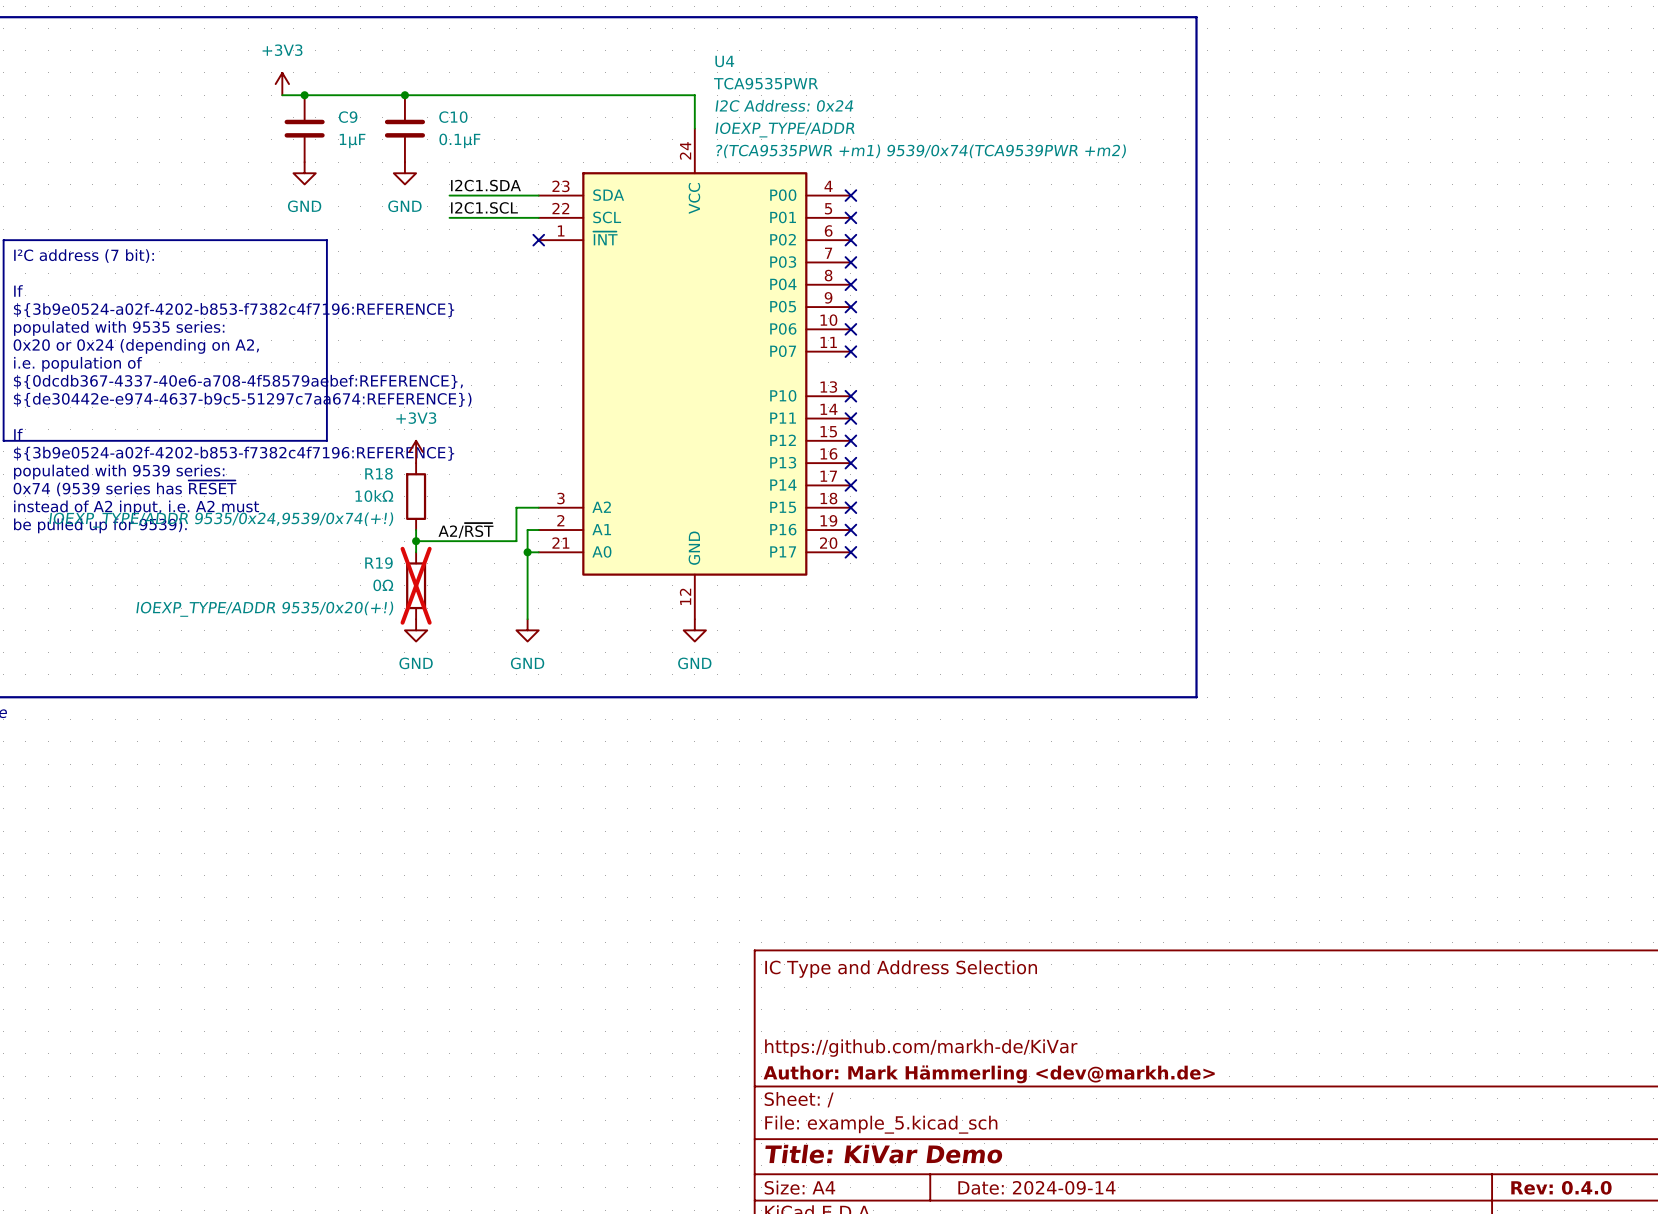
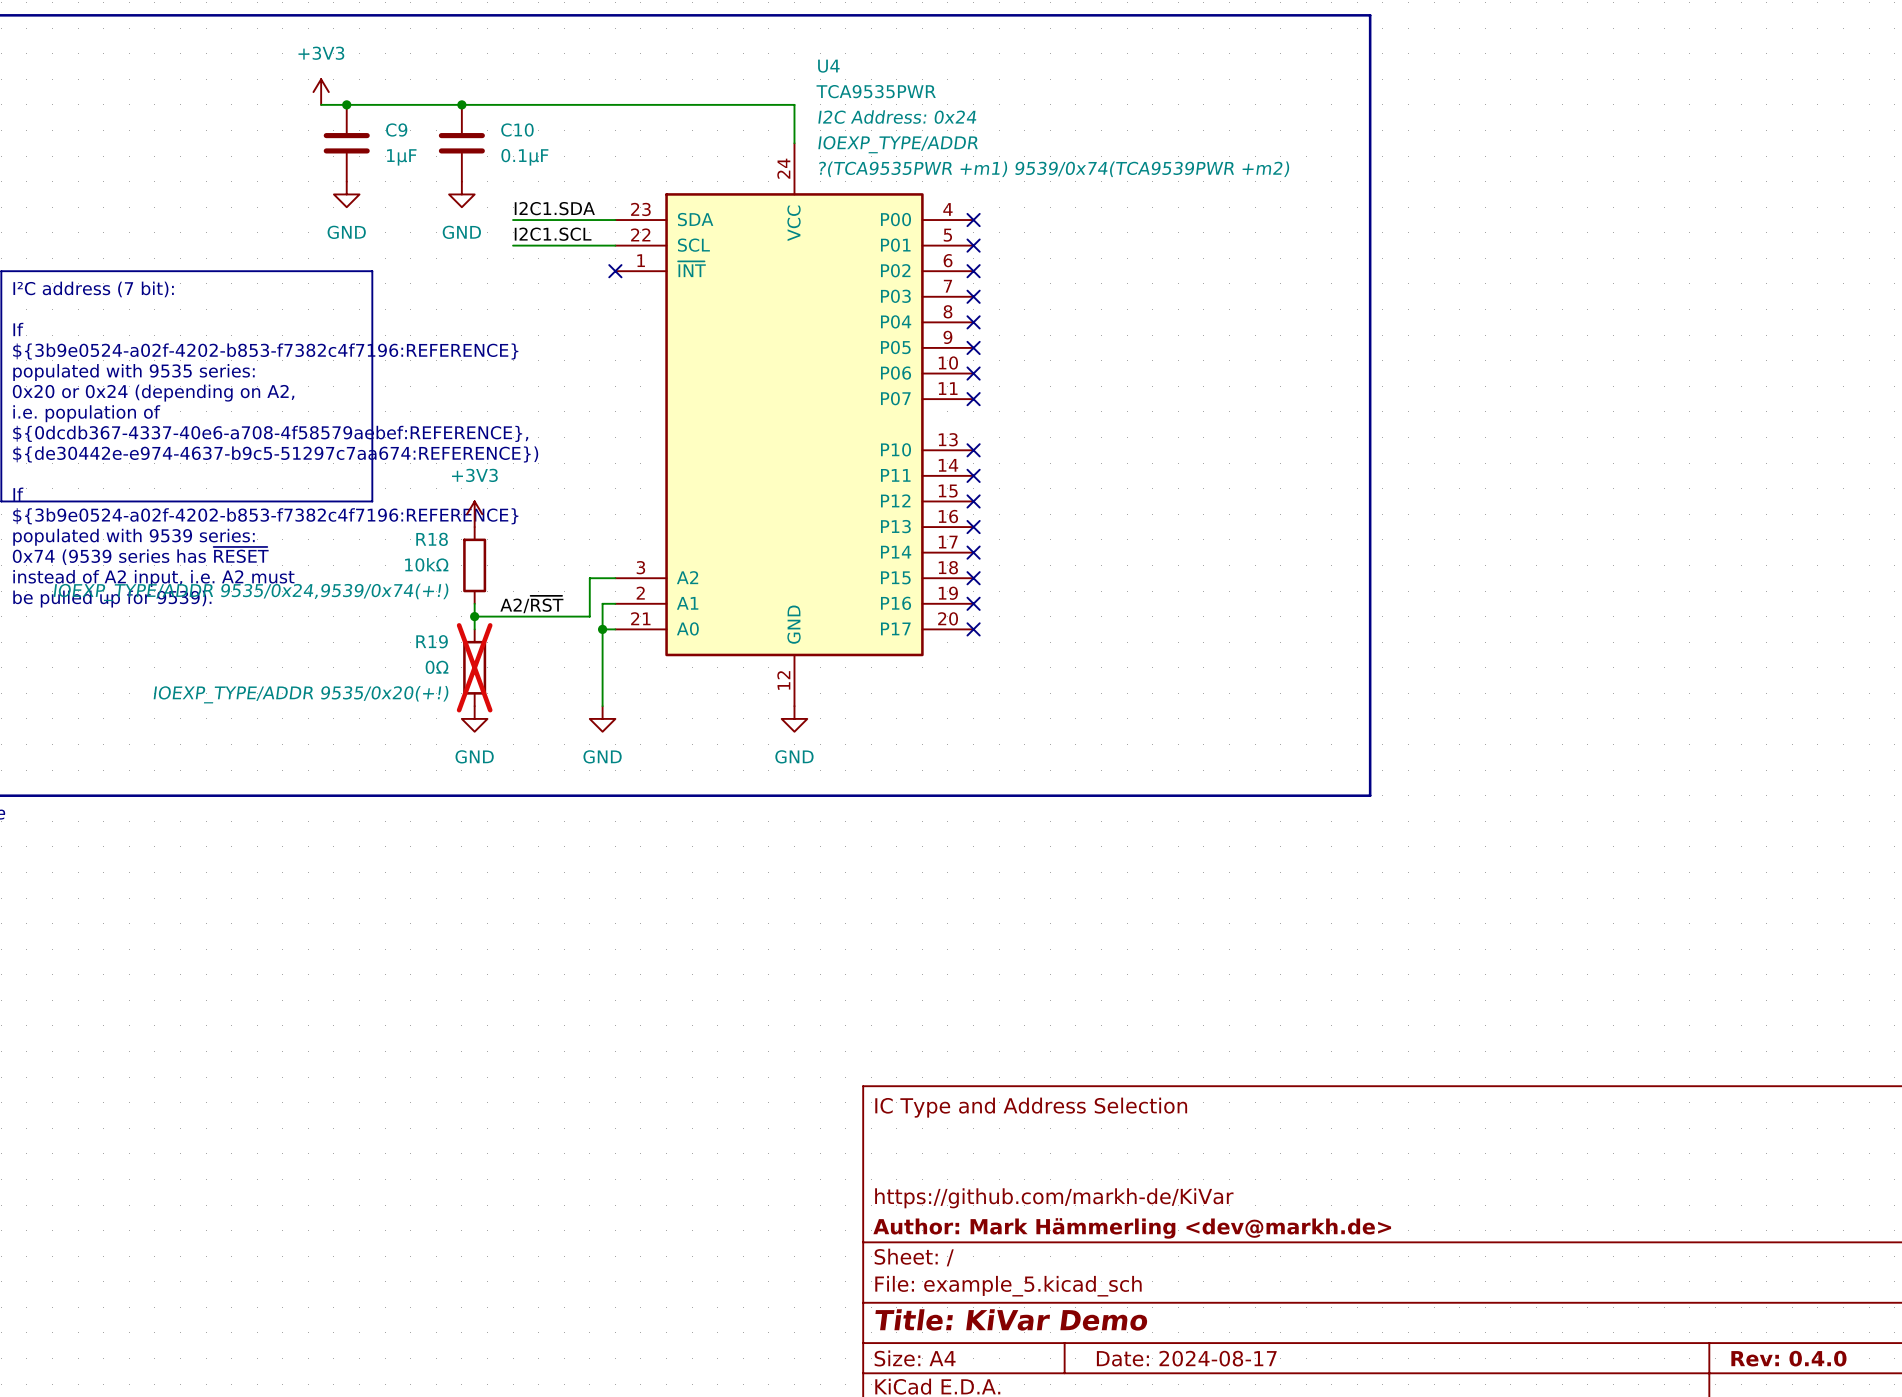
title block: Date: 2024-09-14 (1036, 1187) -> Date: 2024-08-17 (1186, 1358)

